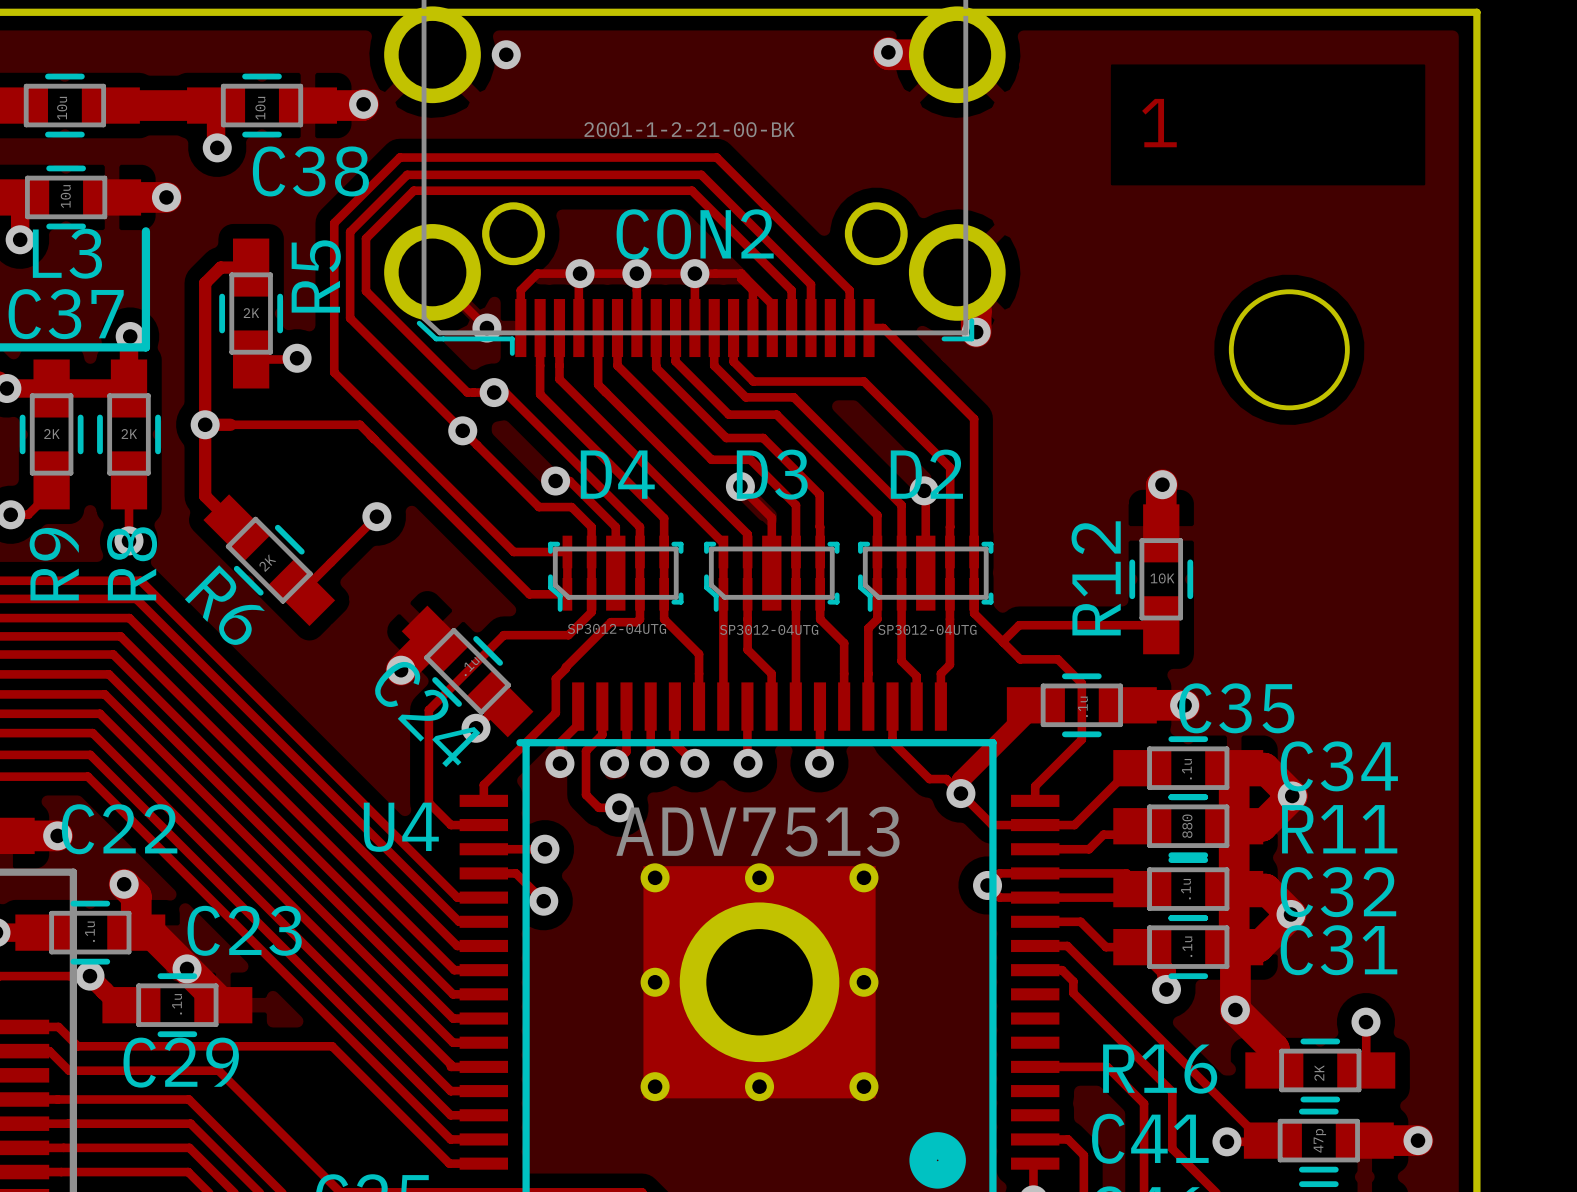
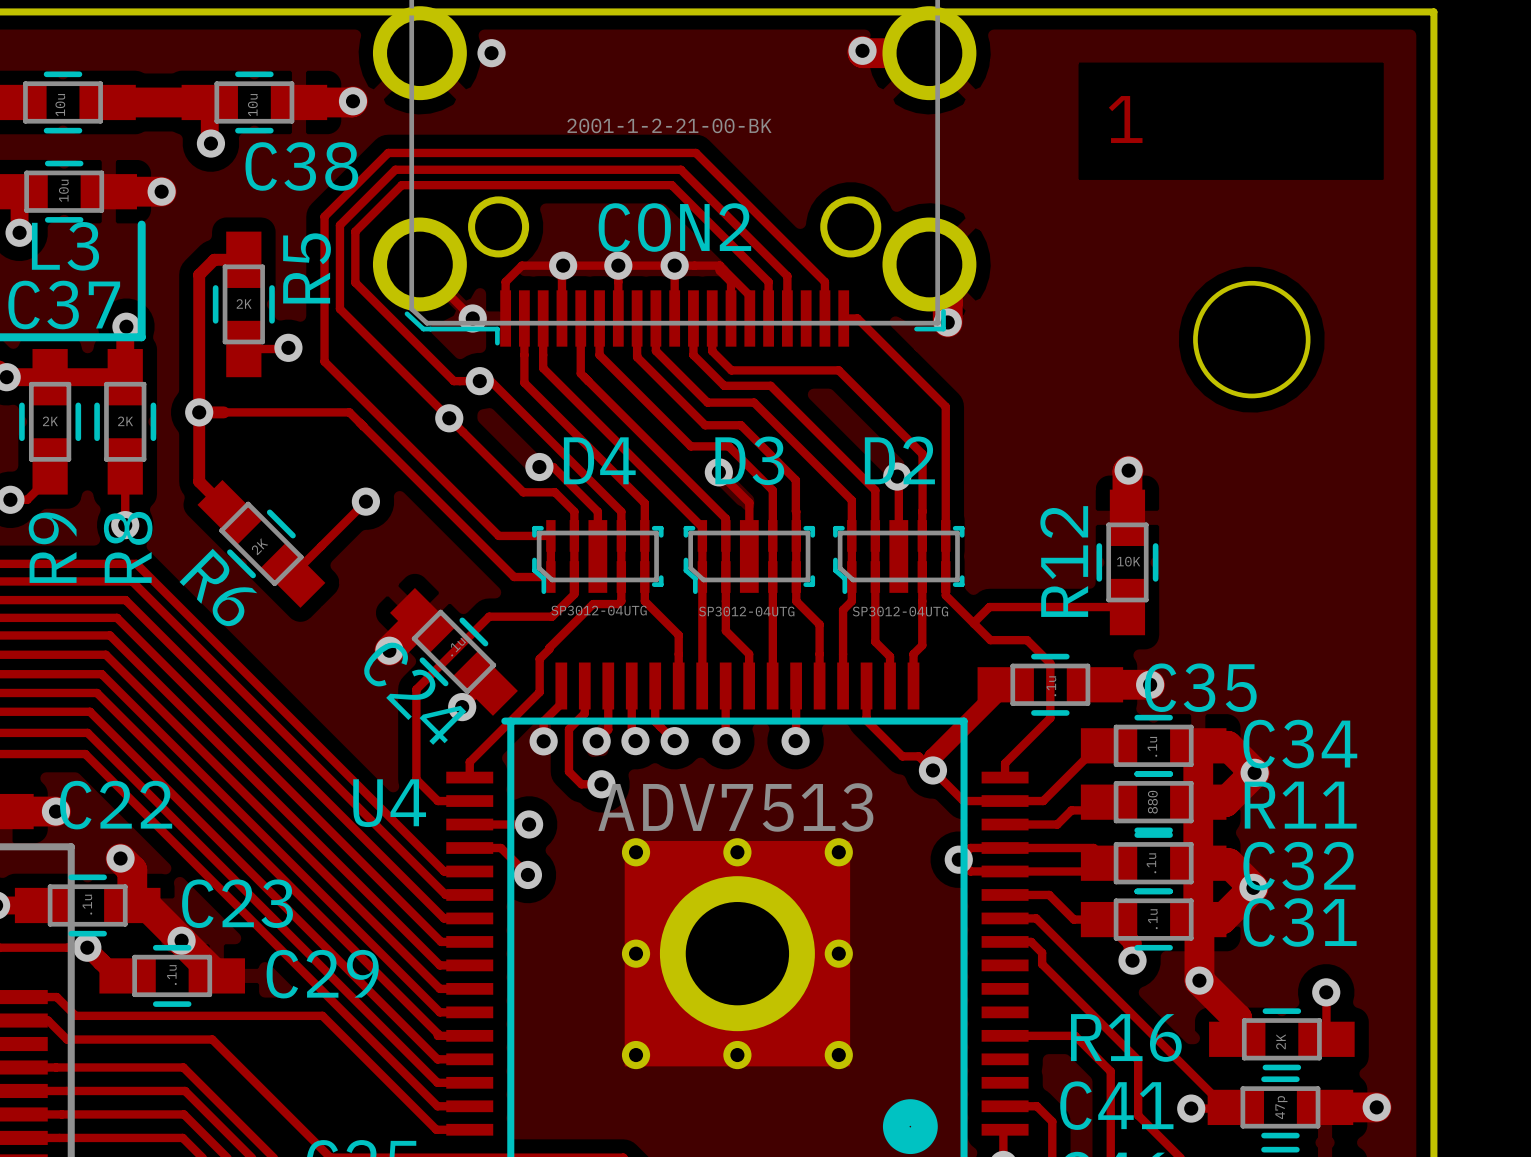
C29 name position: C29 (181, 1062) -> C29 (322, 974)

